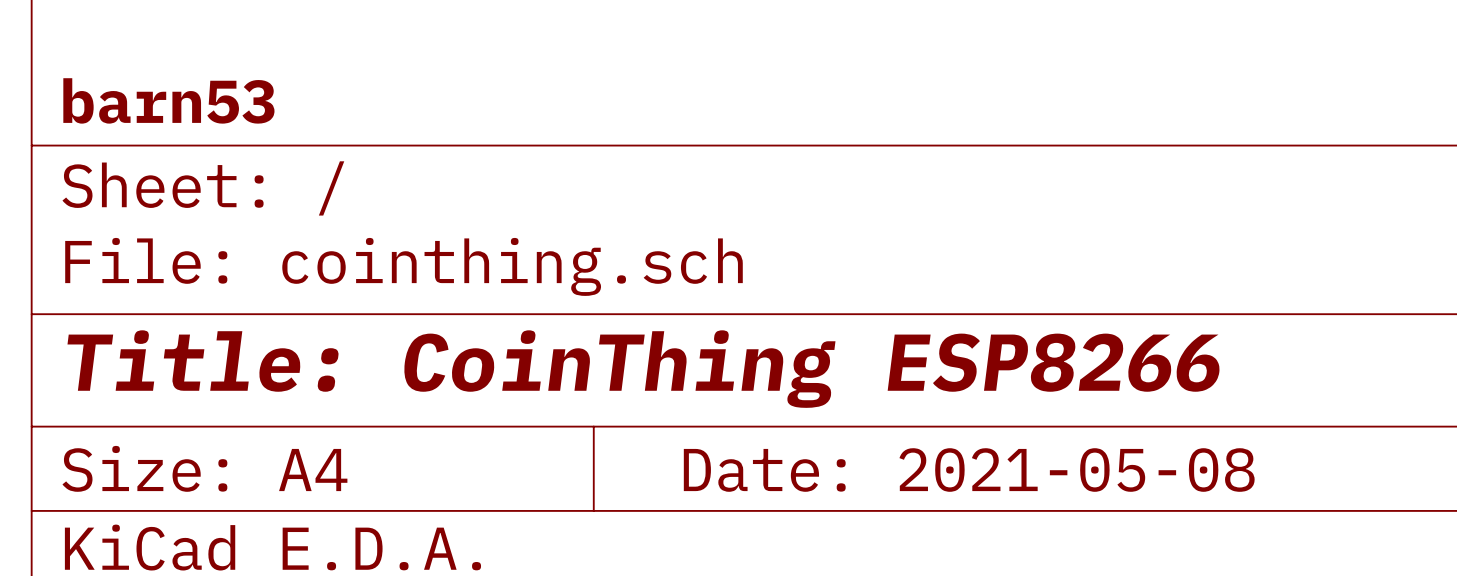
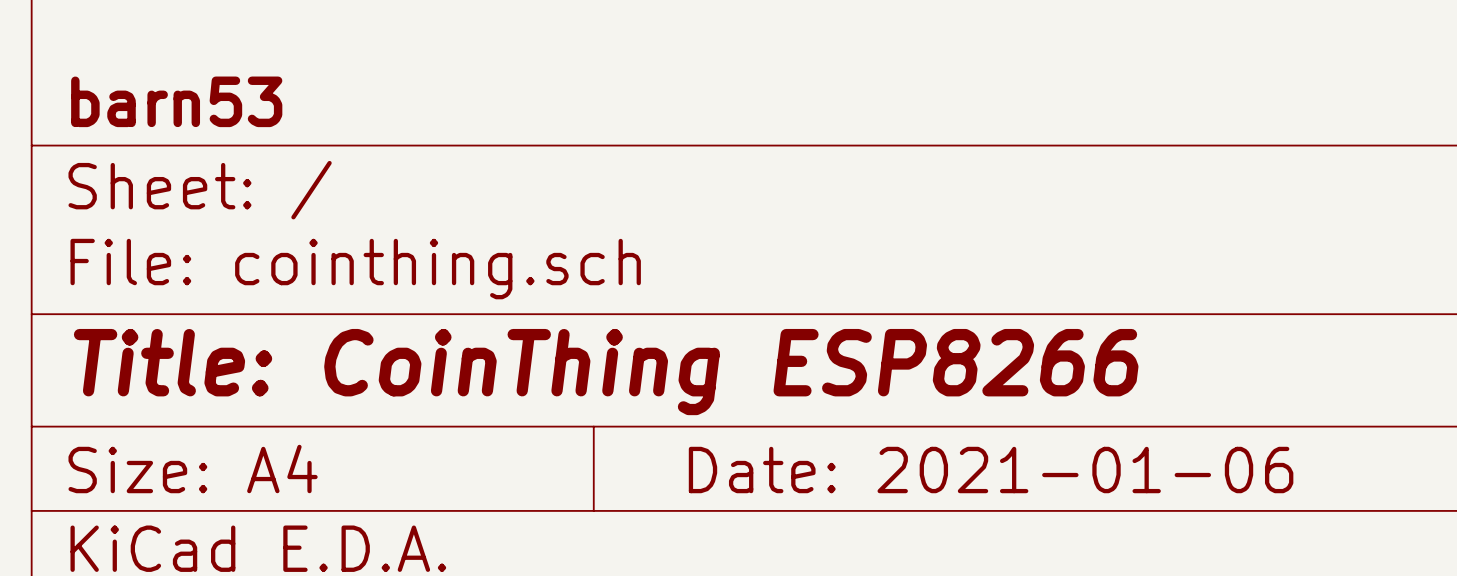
title block: Date: 2021-05-08 (969, 470) -> Date: 2021-01-06 (991, 470)

